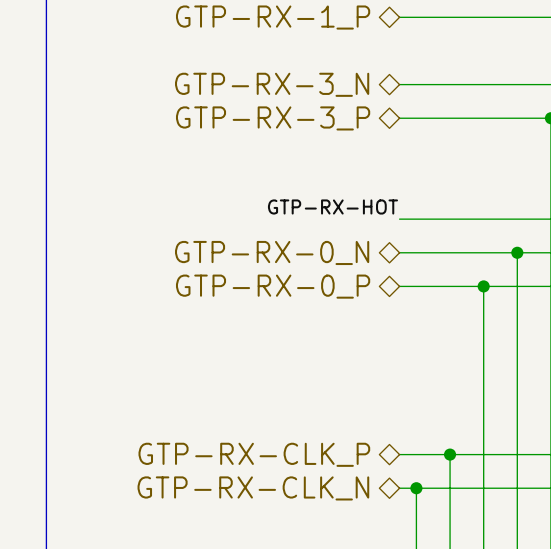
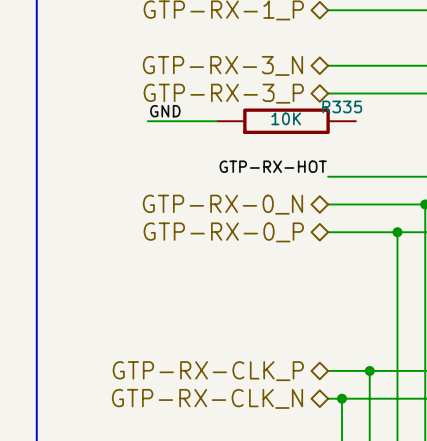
label: none -> GND (165, 111)
wire: none -> (147, 121) (217, 121)
R335: none -> 10K (286, 121)

